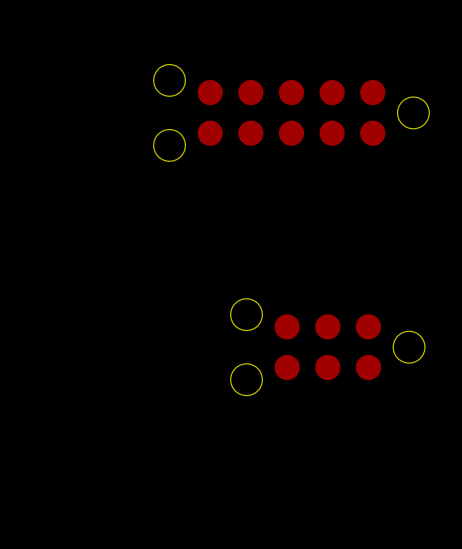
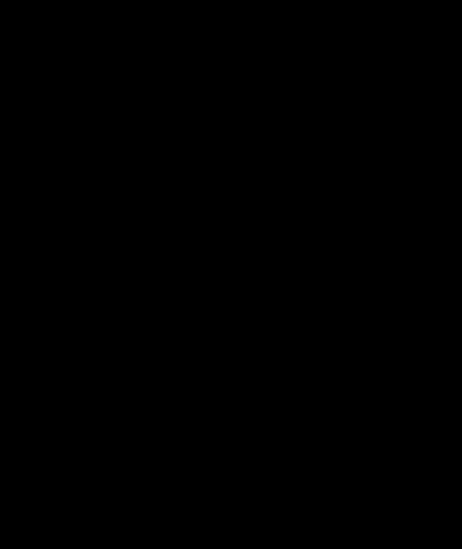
part: (291, 112) -> none
part: (327, 347) -> none

